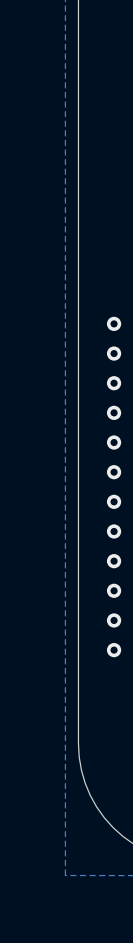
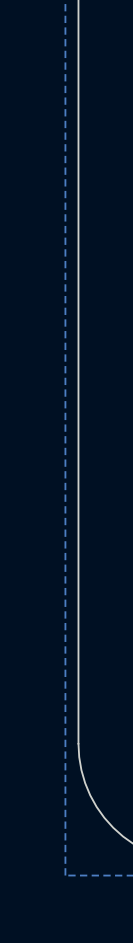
via: (114, 323) -> none
via: (114, 353) -> none
via: (114, 383) -> none
via: (114, 412) -> none
via: (114, 442) -> none
via: (114, 472) -> none
via: (114, 501) -> none
via: (114, 531) -> none
via: (114, 561) -> none
via: (114, 590) -> none
via: (114, 620) -> none
via: (114, 650) -> none

